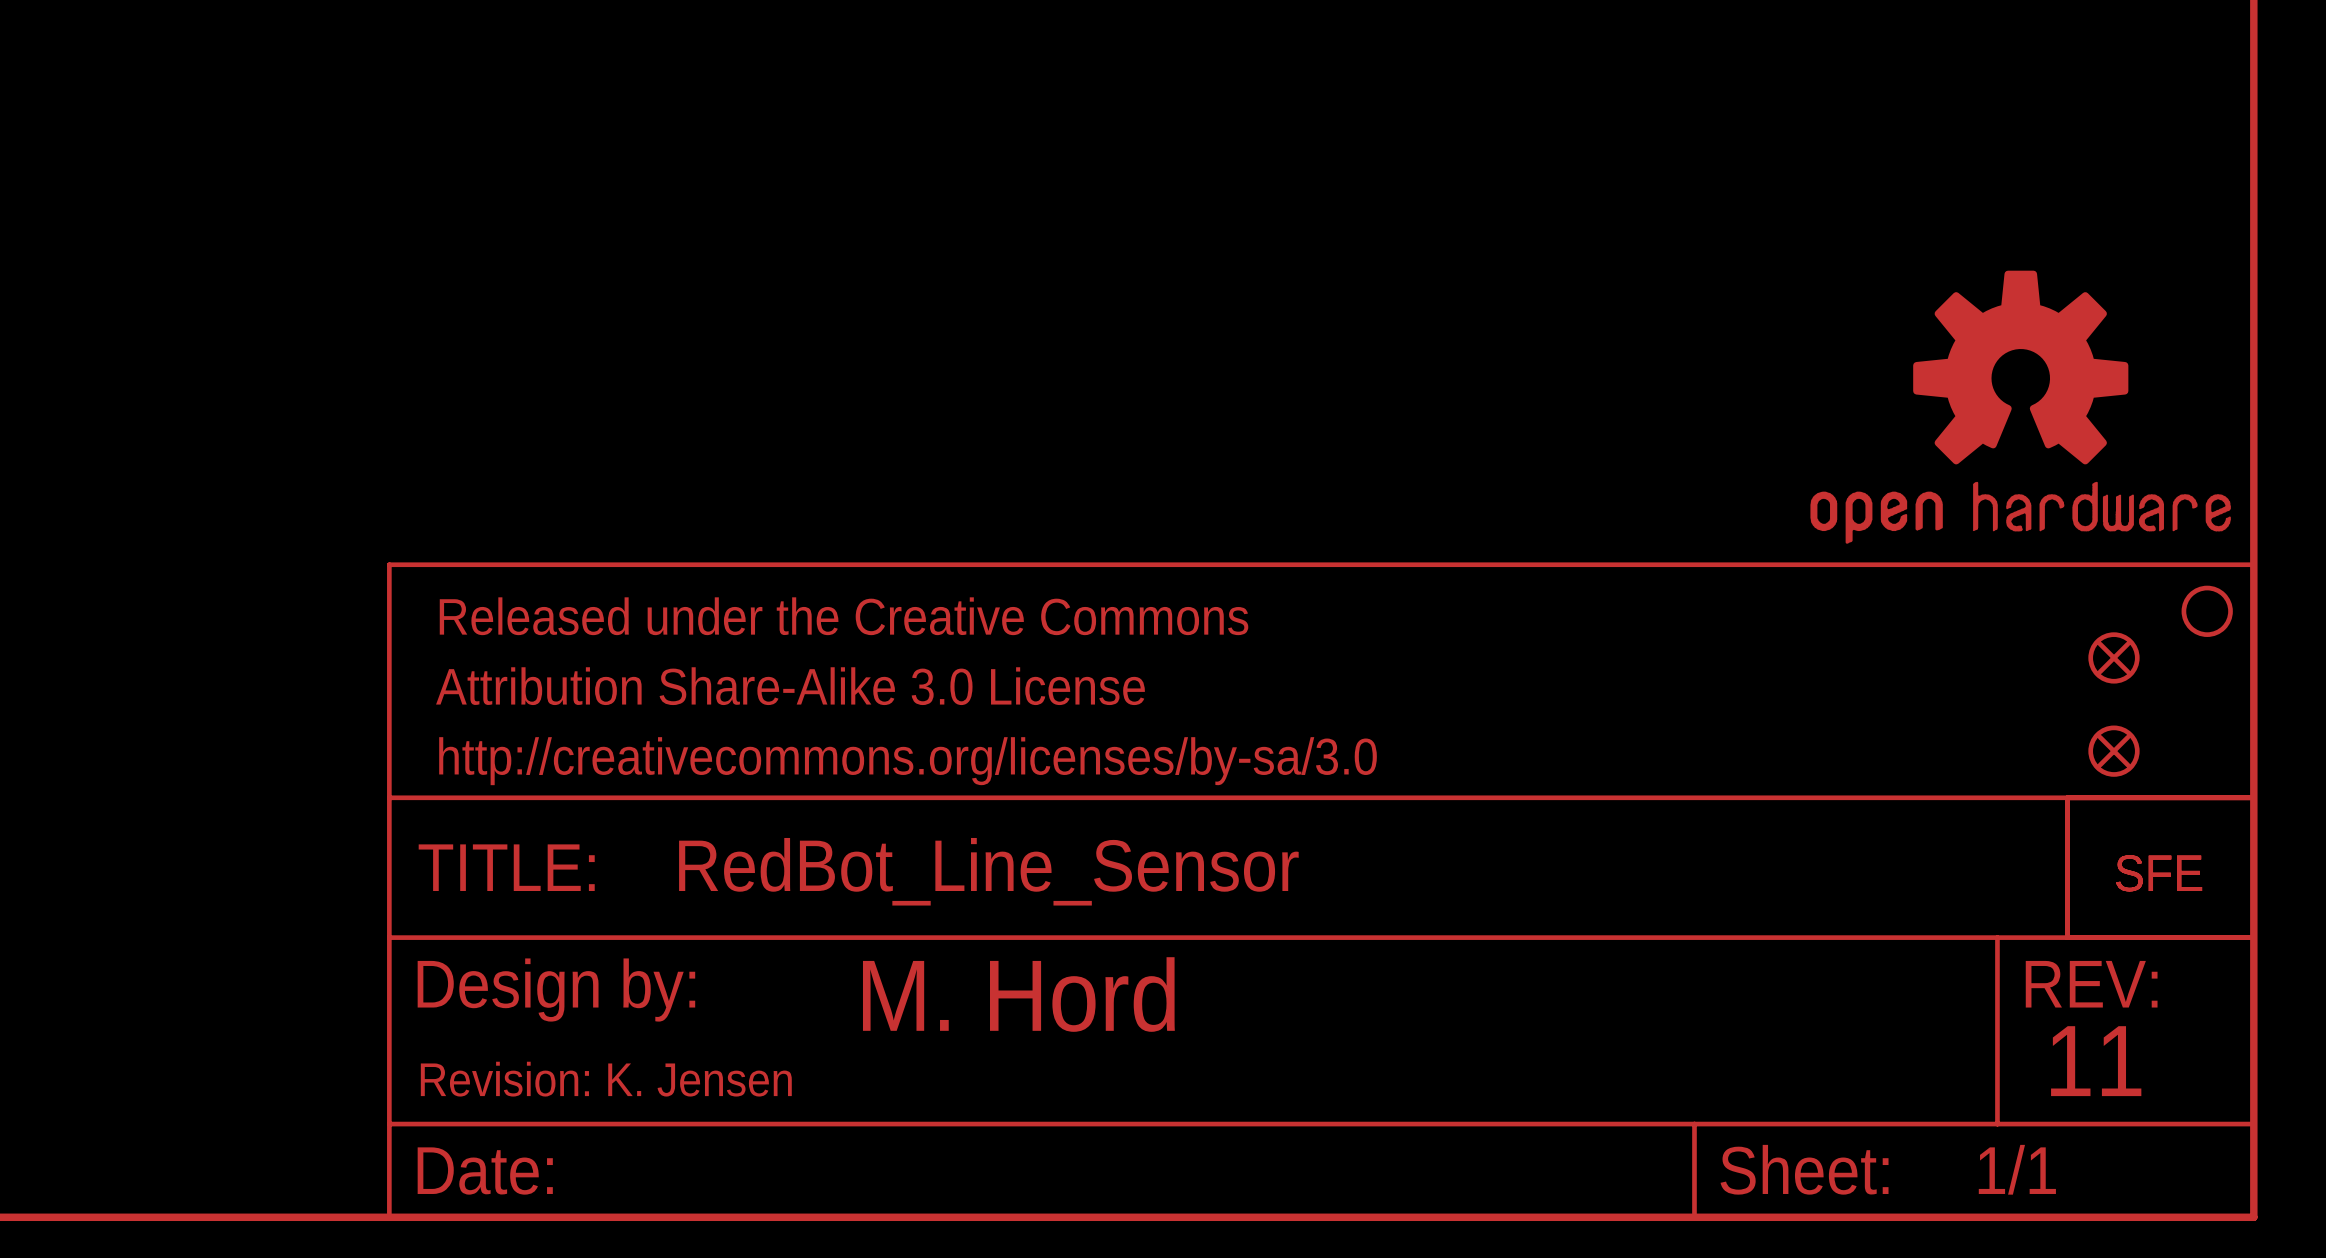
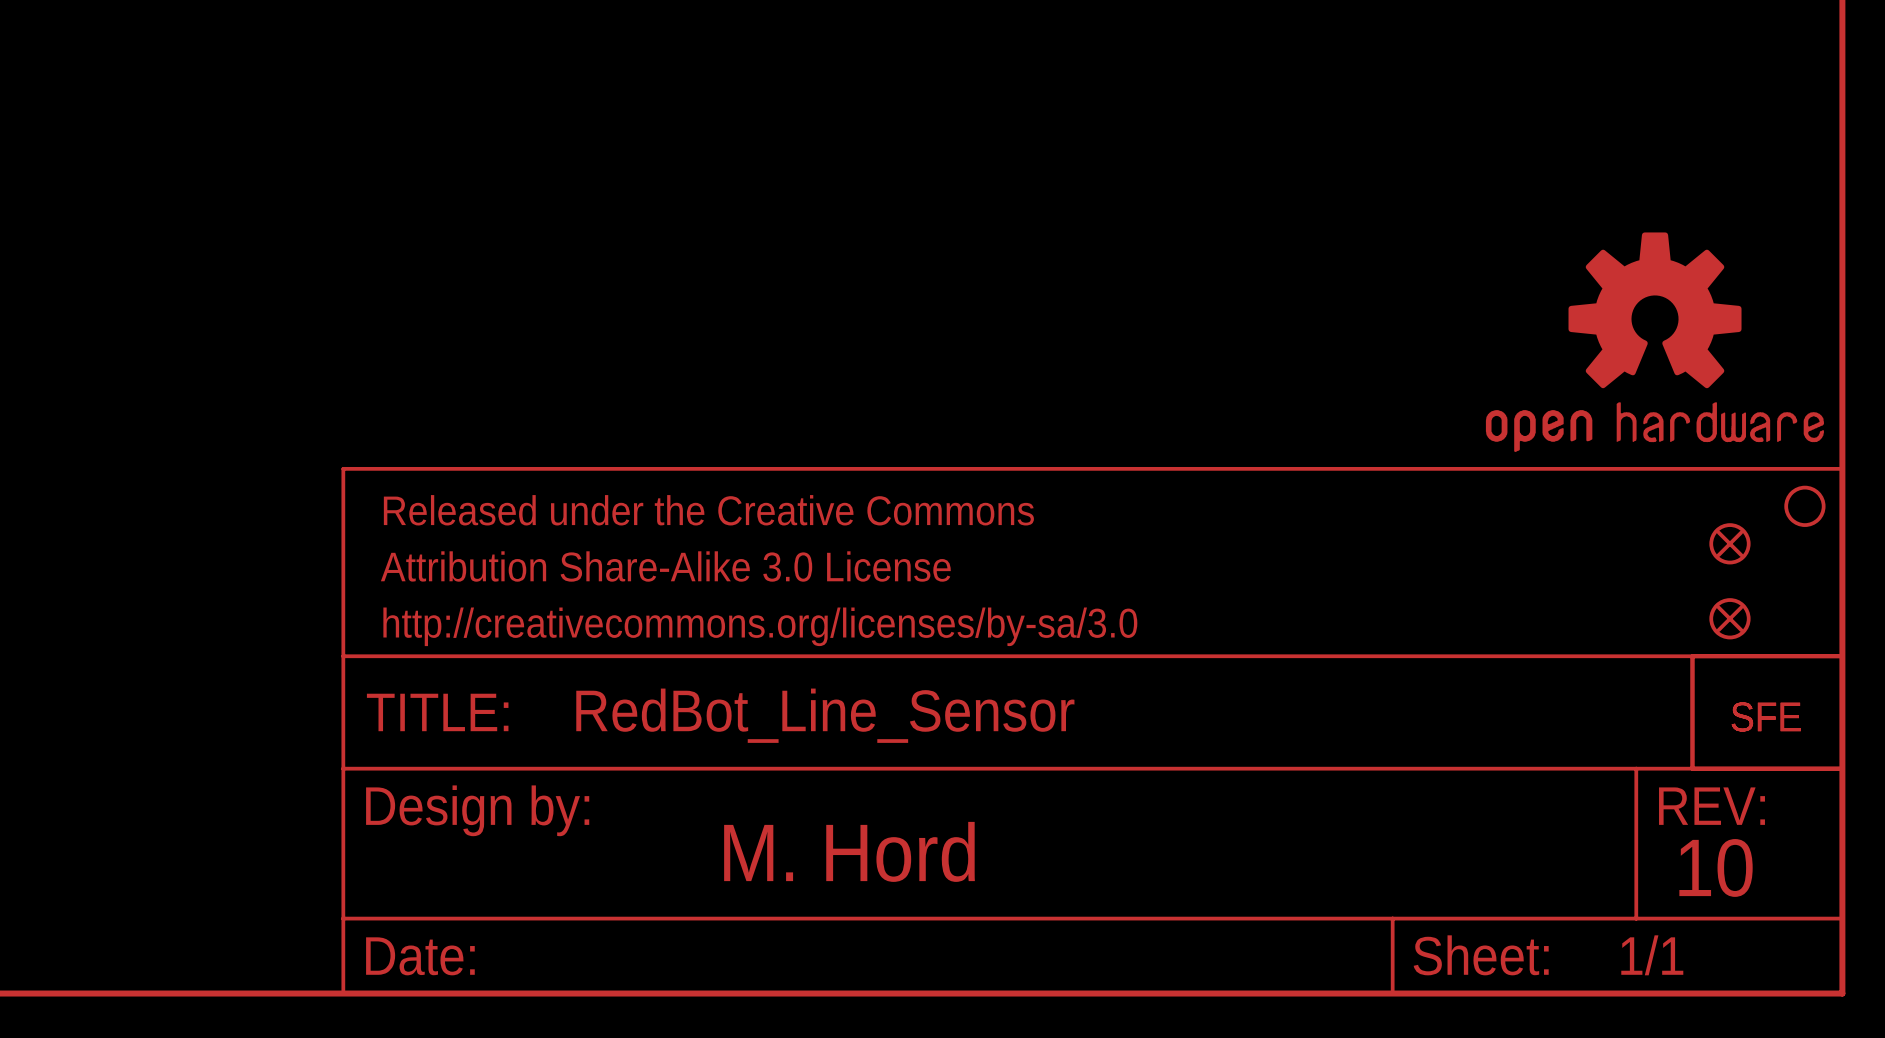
text position: M. Hord (1018, 994) -> M. Hord (849, 851)
text: 11 (2096, 1061) -> 10 (1716, 867)
text: Revision: K. Jensen (606, 1079) -> none

